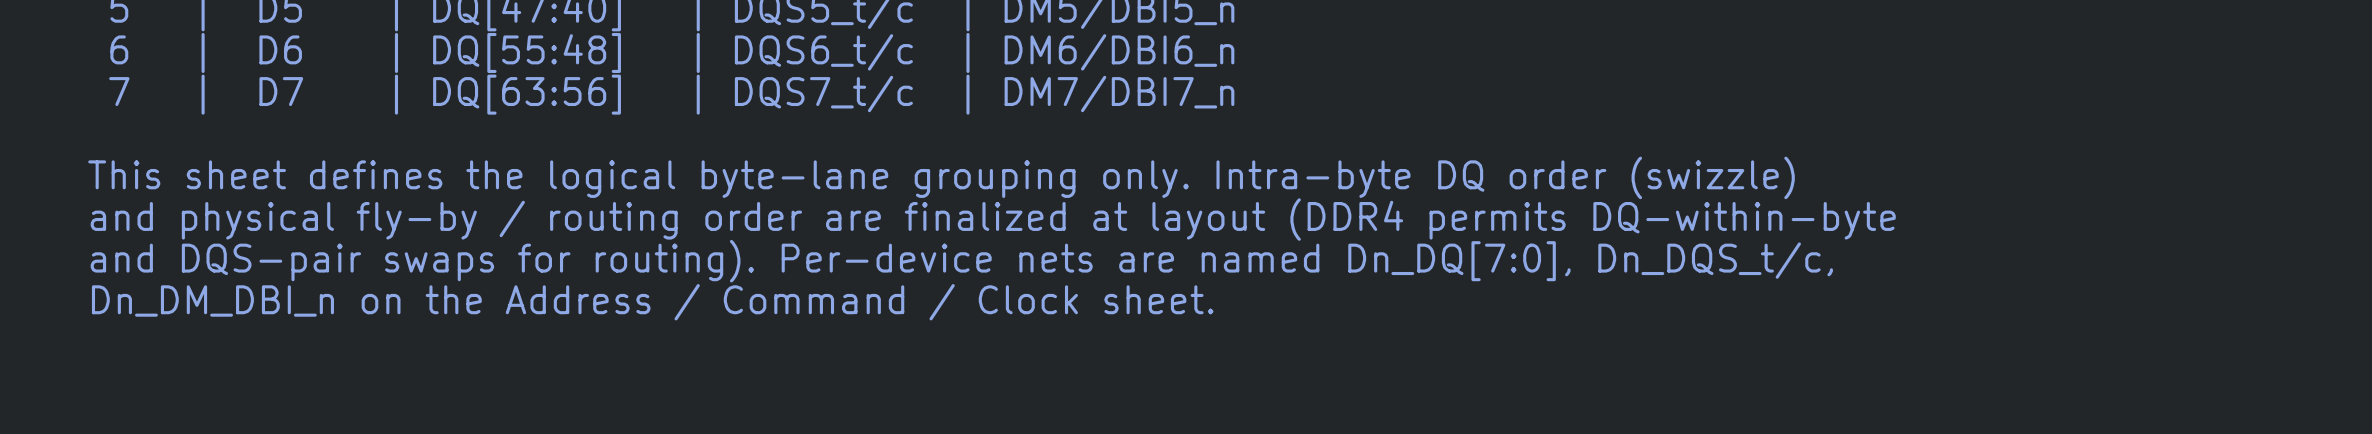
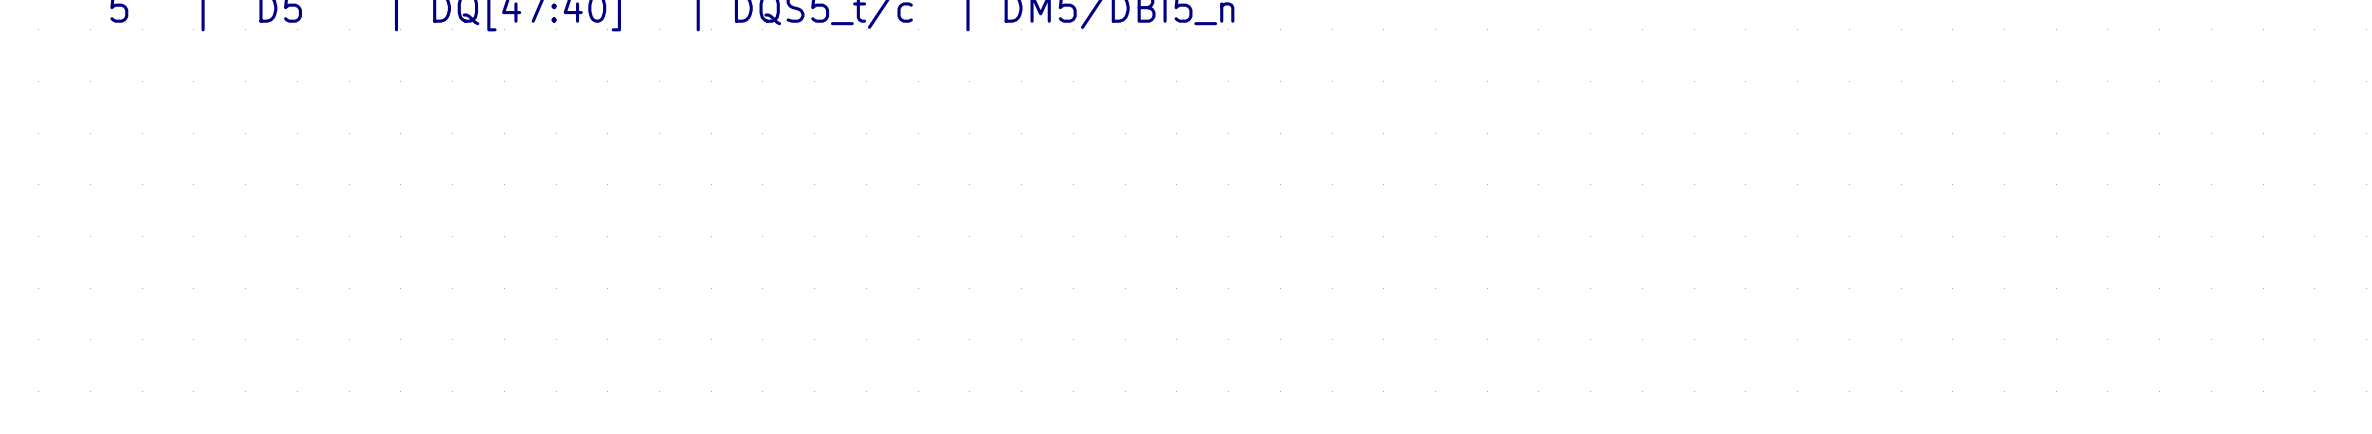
text: 6 | D6 | DQ[55:48] | DQS6_t/c | DM6/DBI6_n (672, 52) -> none
text: 7 | D7 | DQ[63:56] | DQS7_t/c | DM7/DBI7_n (671, 94) -> none
text: This sheet defines the logical byte-lane grouping only. Intra-byte DQ order (swizzle) (941, 177) -> none
text: and physical fly-by / routing order are finalized at layout (DDR4 permits DQ-within-byte (993, 219) -> none
text: and DQS-pair swaps for routing). Per-device nets are named Dn_DQ[7:0], Dn_DQS_t/c, (961, 261) -> none
text: Dn_DM_DBI_n on the Address / Command / Clock sheet. (652, 302) -> none

